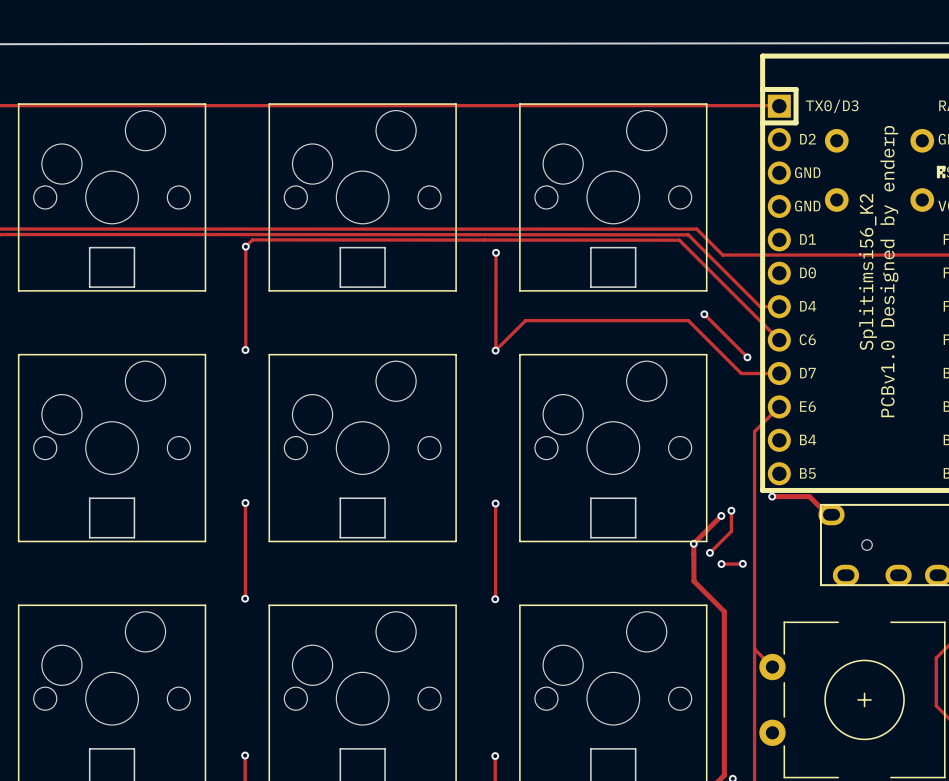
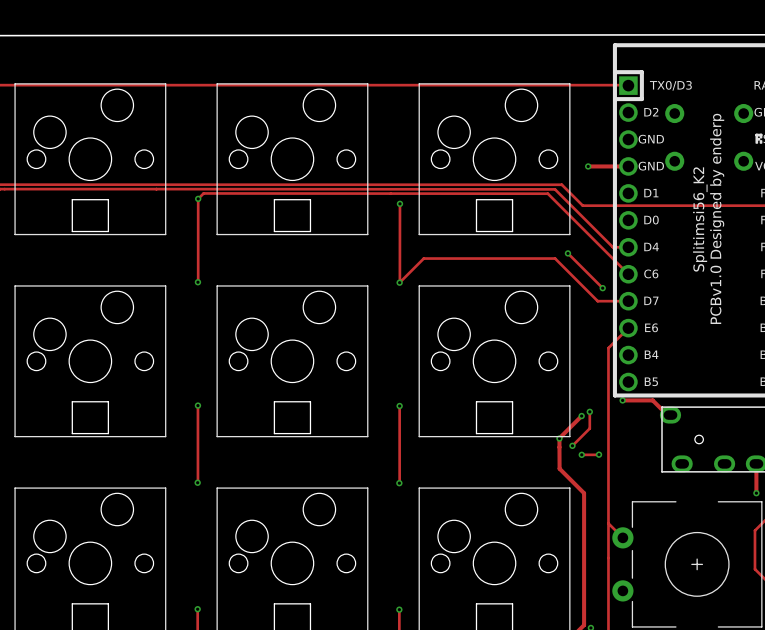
track: none -> (588, 166) (628, 166)
via: none -> (588, 166)
track: none -> (756, 463) (756, 493)
via: none -> (756, 493)

